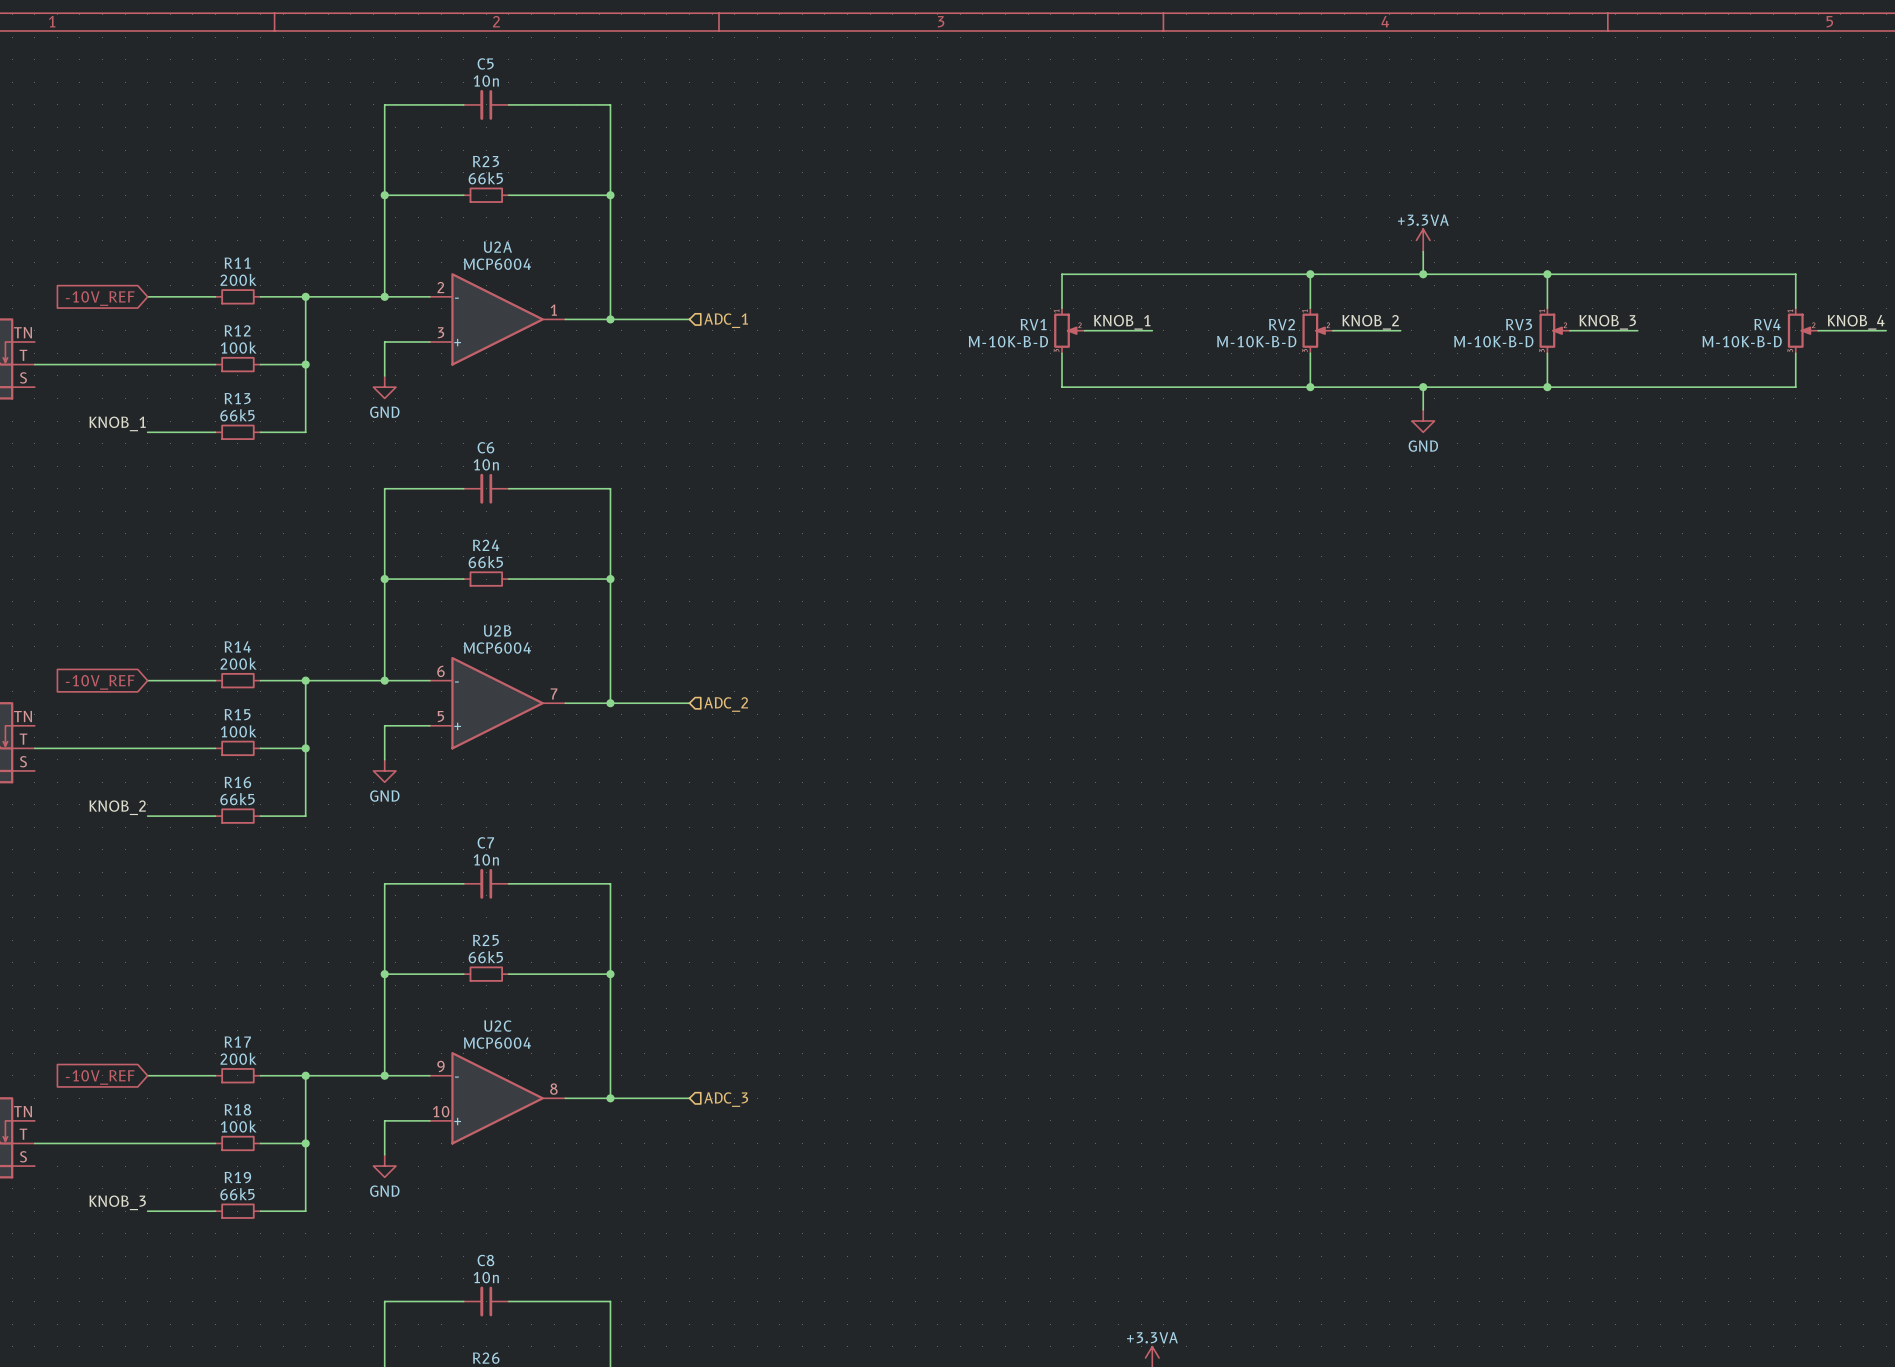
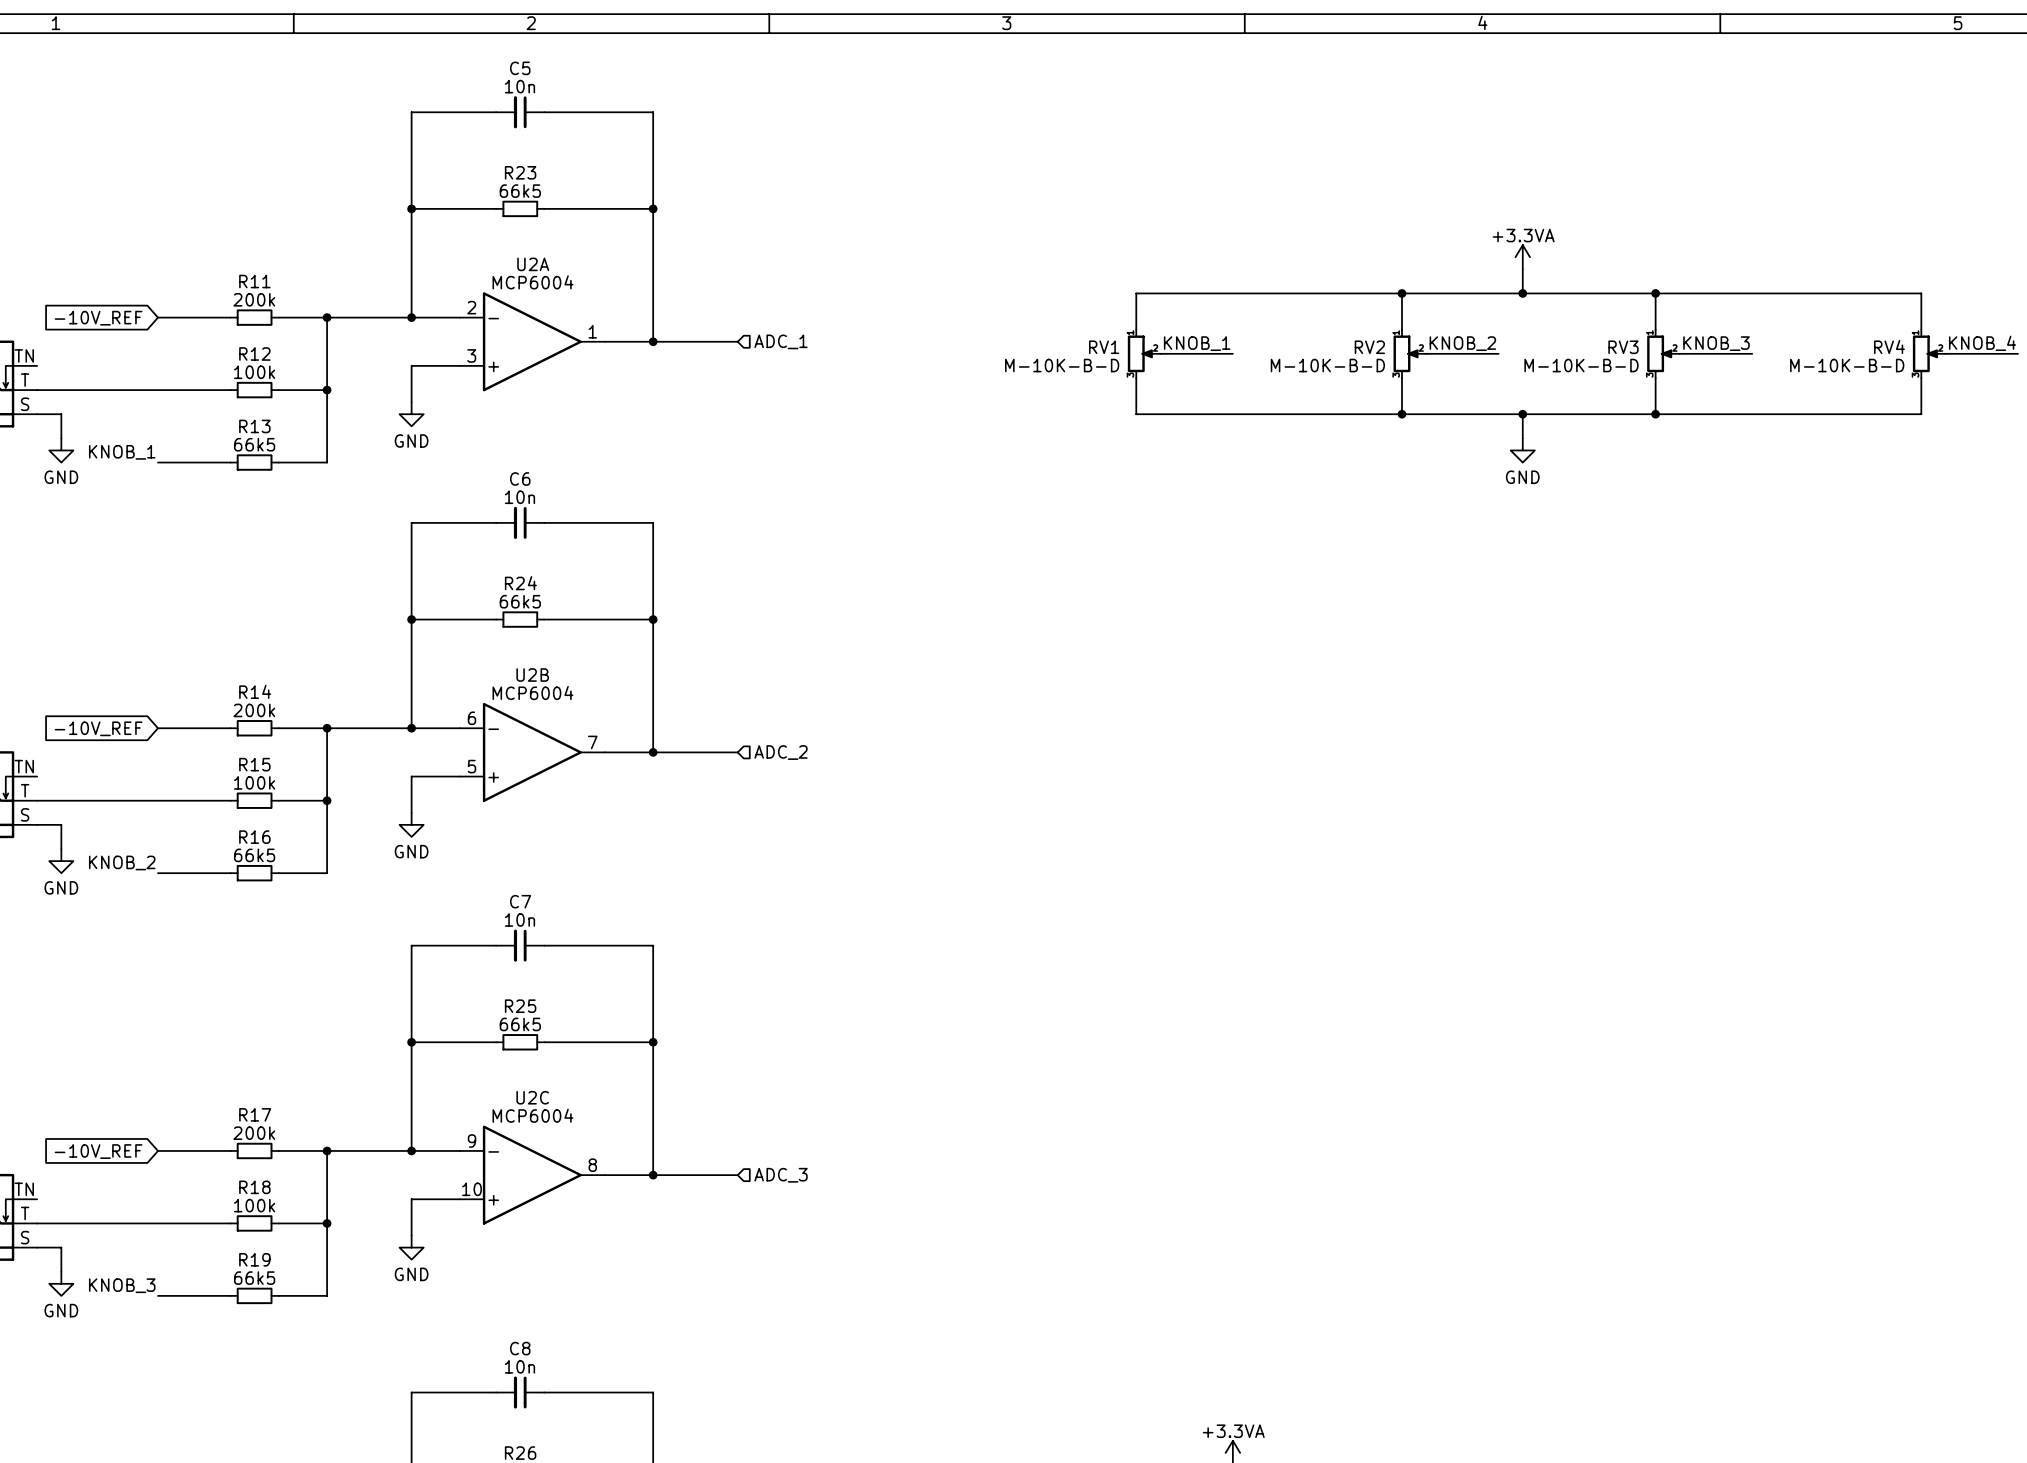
wire: none -> (37, 414) (61, 414) (61, 438)
power symbol: none -> GND (61, 450)
wire: none -> (37, 824) (61, 824) (61, 849)
power symbol: none -> GND (61, 861)
wire: none -> (37, 1247) (61, 1247) (61, 1271)
power symbol: none -> GND (61, 1283)

